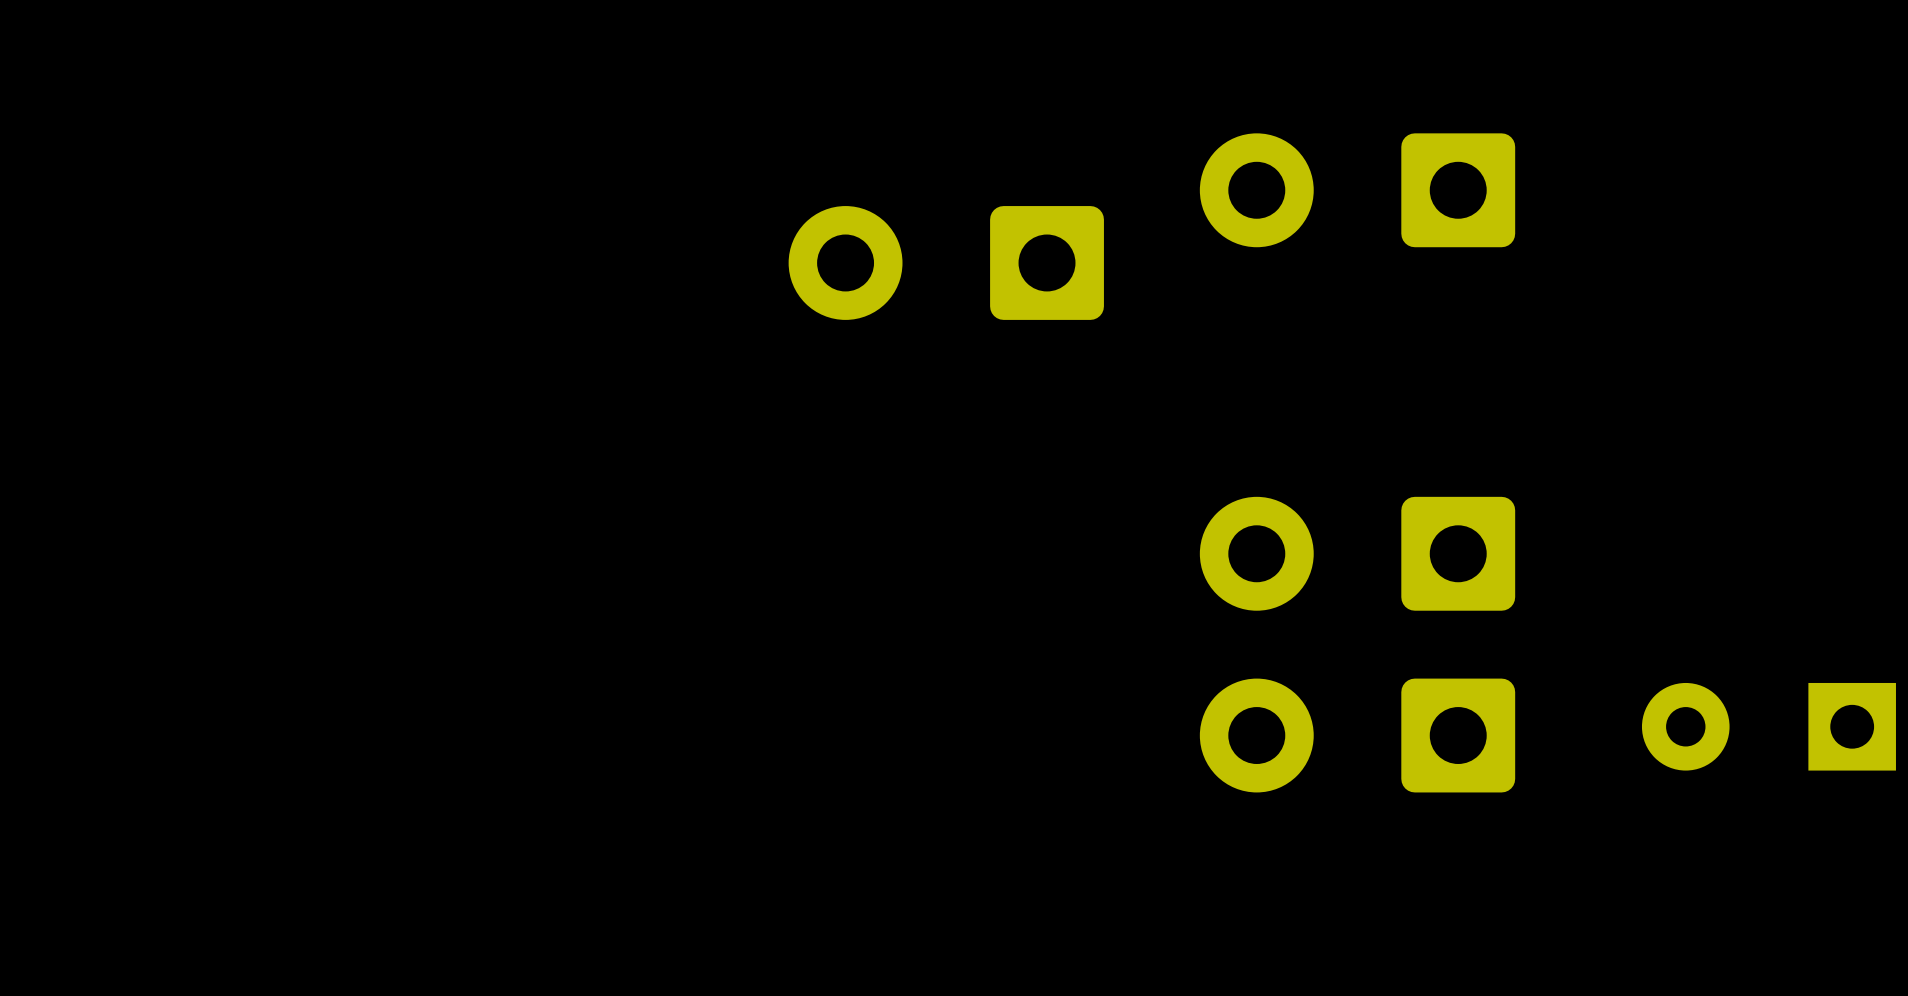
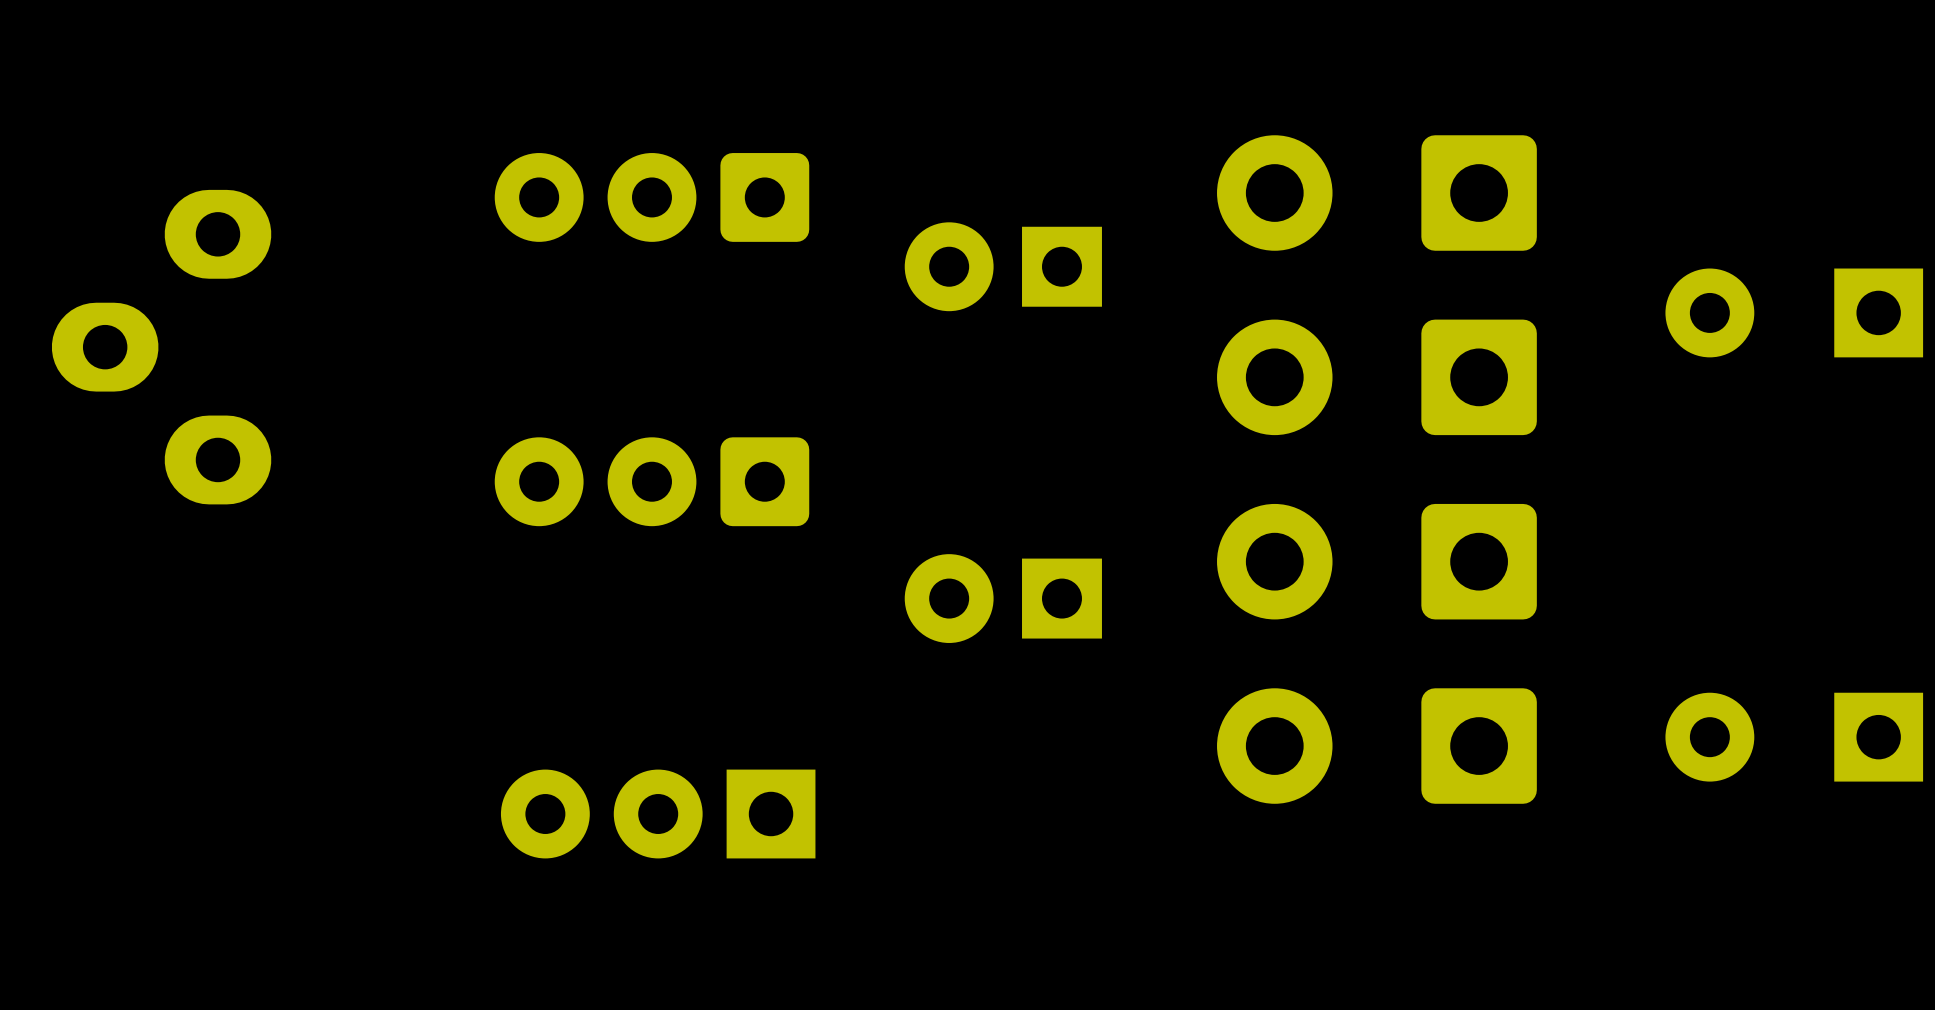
part: none -> (651, 197)
part footprint: [788, 206, 1104, 320] -> [904, 222, 1102, 312]
part: none -> (1794, 312)
part: none -> (161, 347)
part: none -> (1376, 377)
part: none -> (651, 481)
part: none -> (1003, 598)
part: none -> (658, 814)

